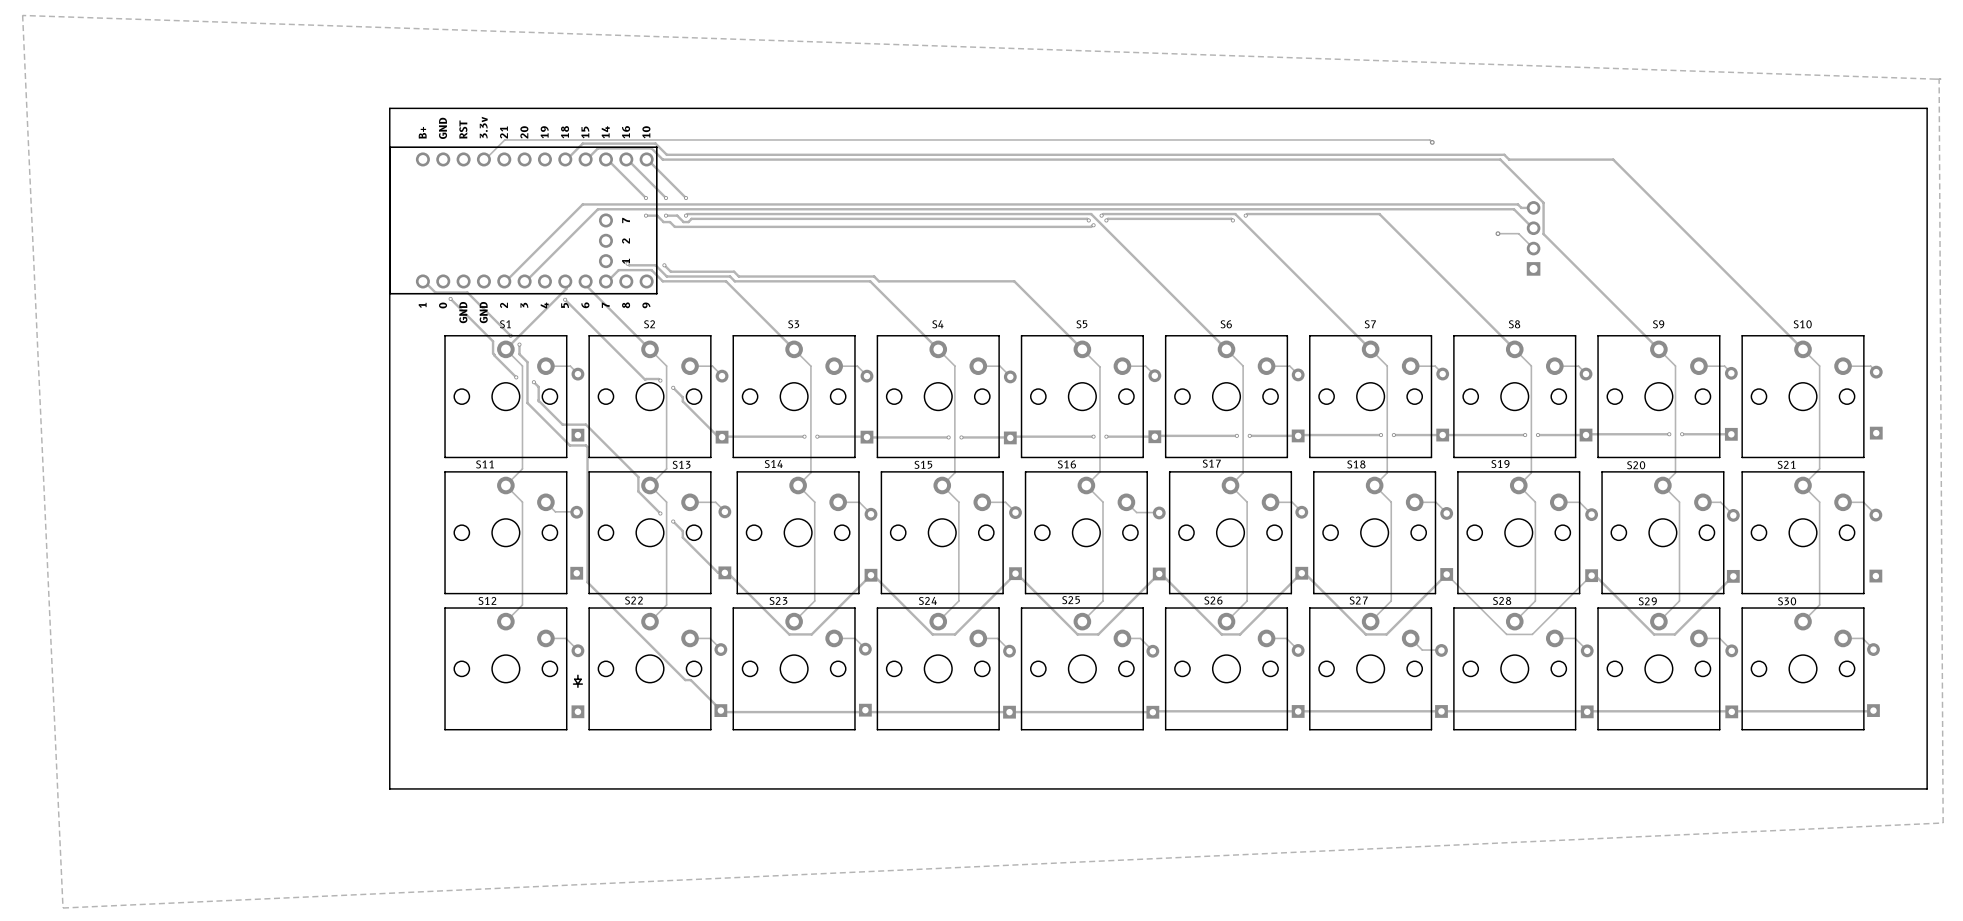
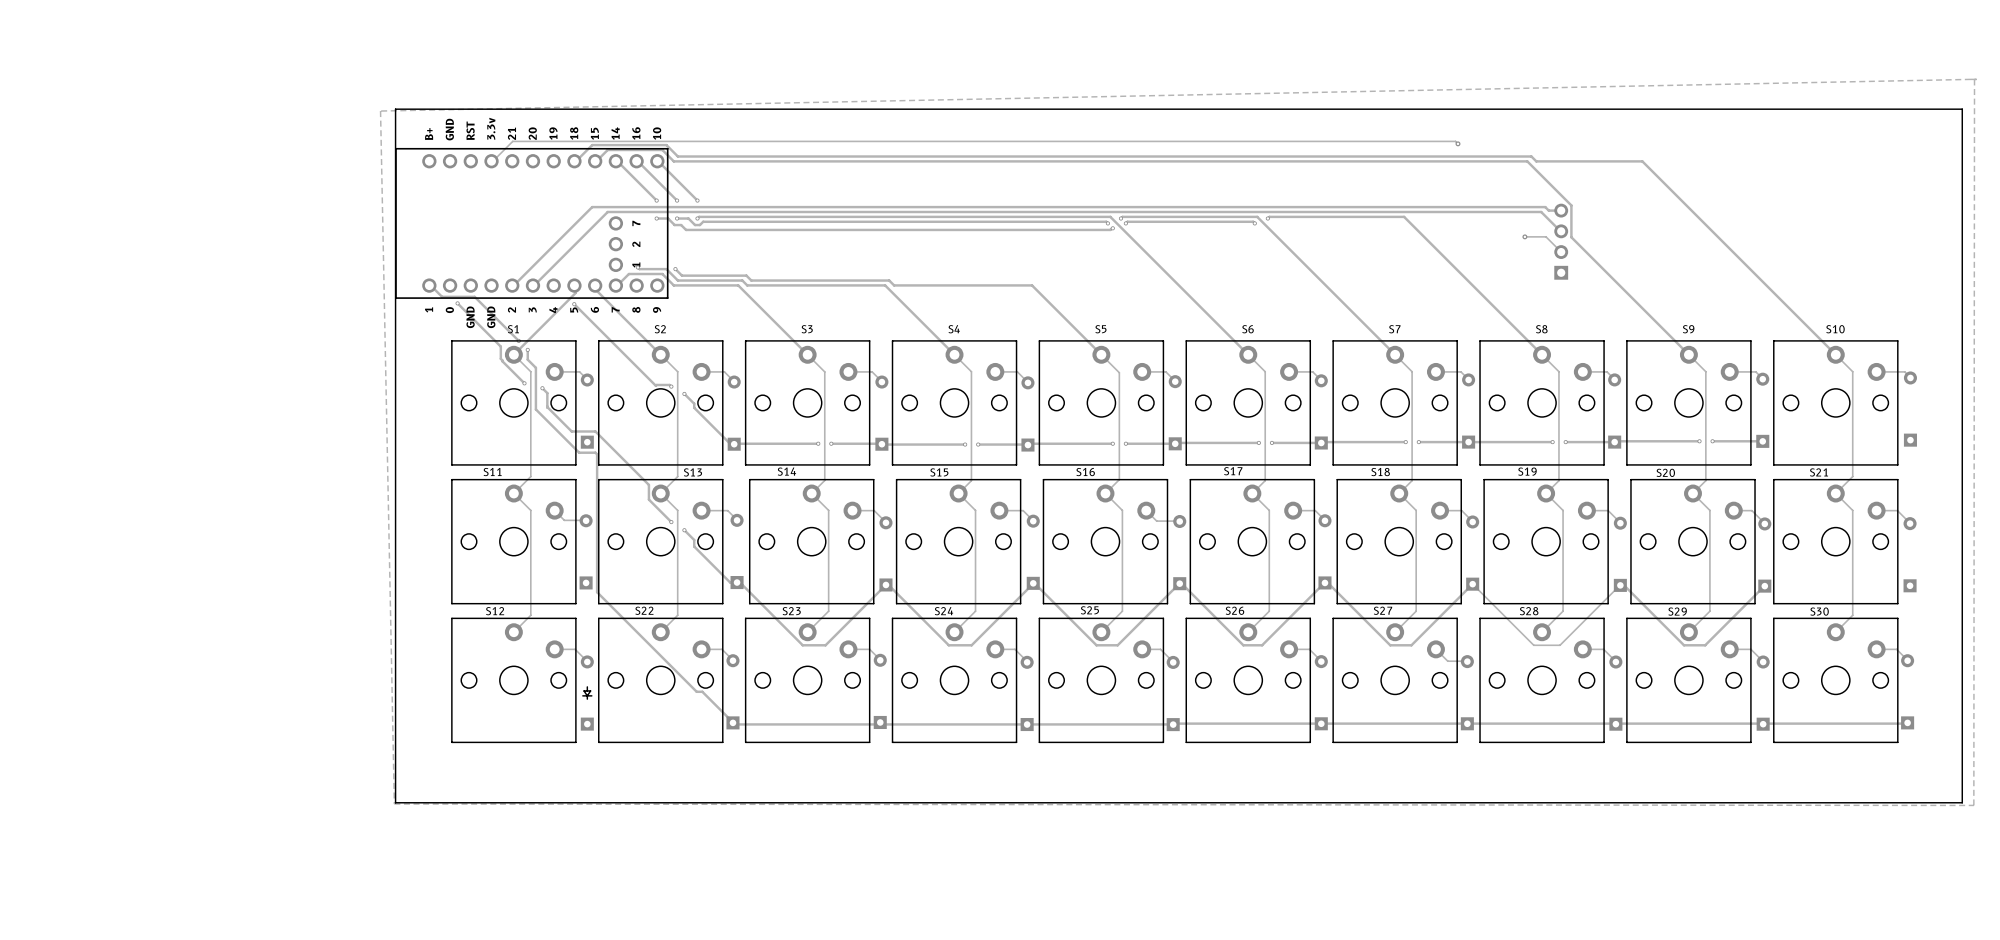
zone outline: (1935, 79) (22, 15) (63, 908) (1943, 822) (1939, 79) -> (1970, 79) (380, 111) (394, 803) (1973, 805) (1974, 79)

